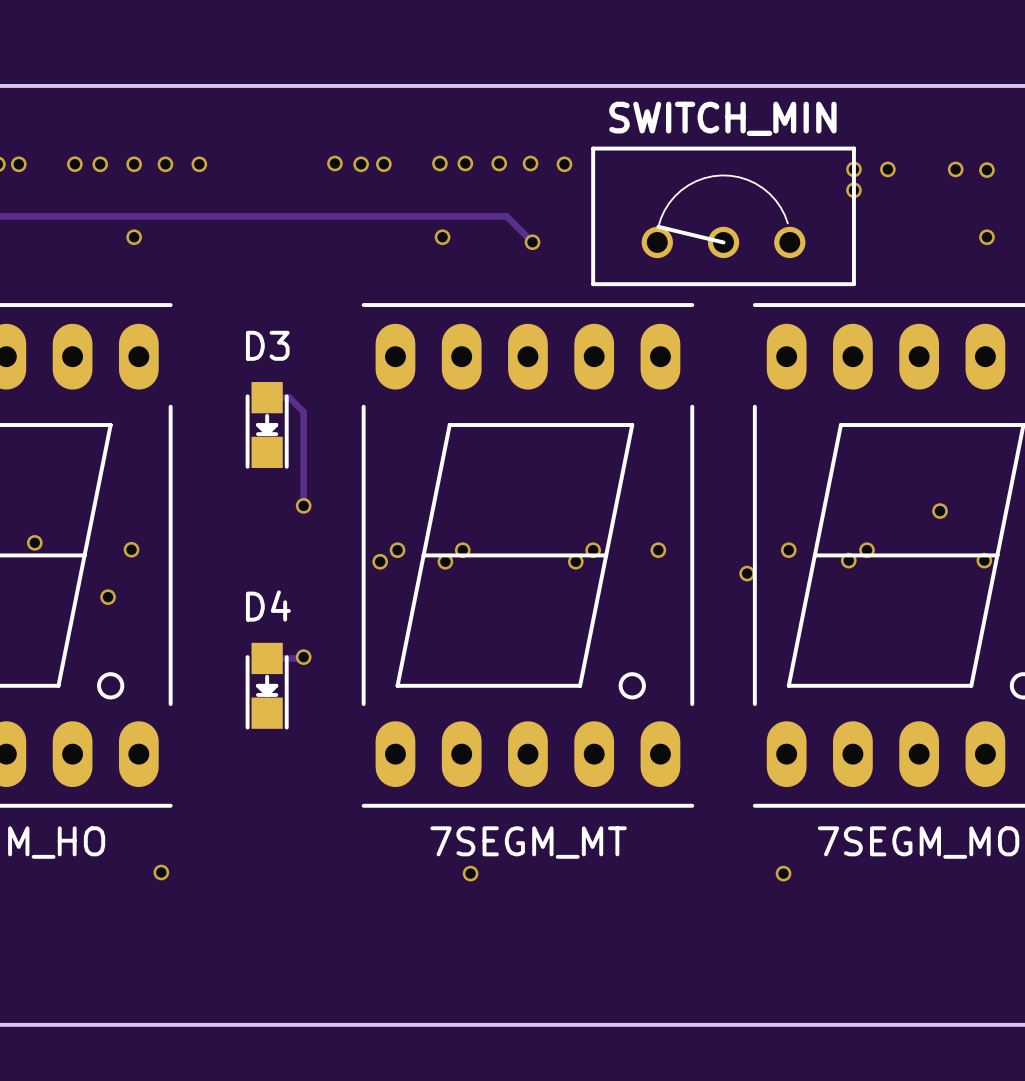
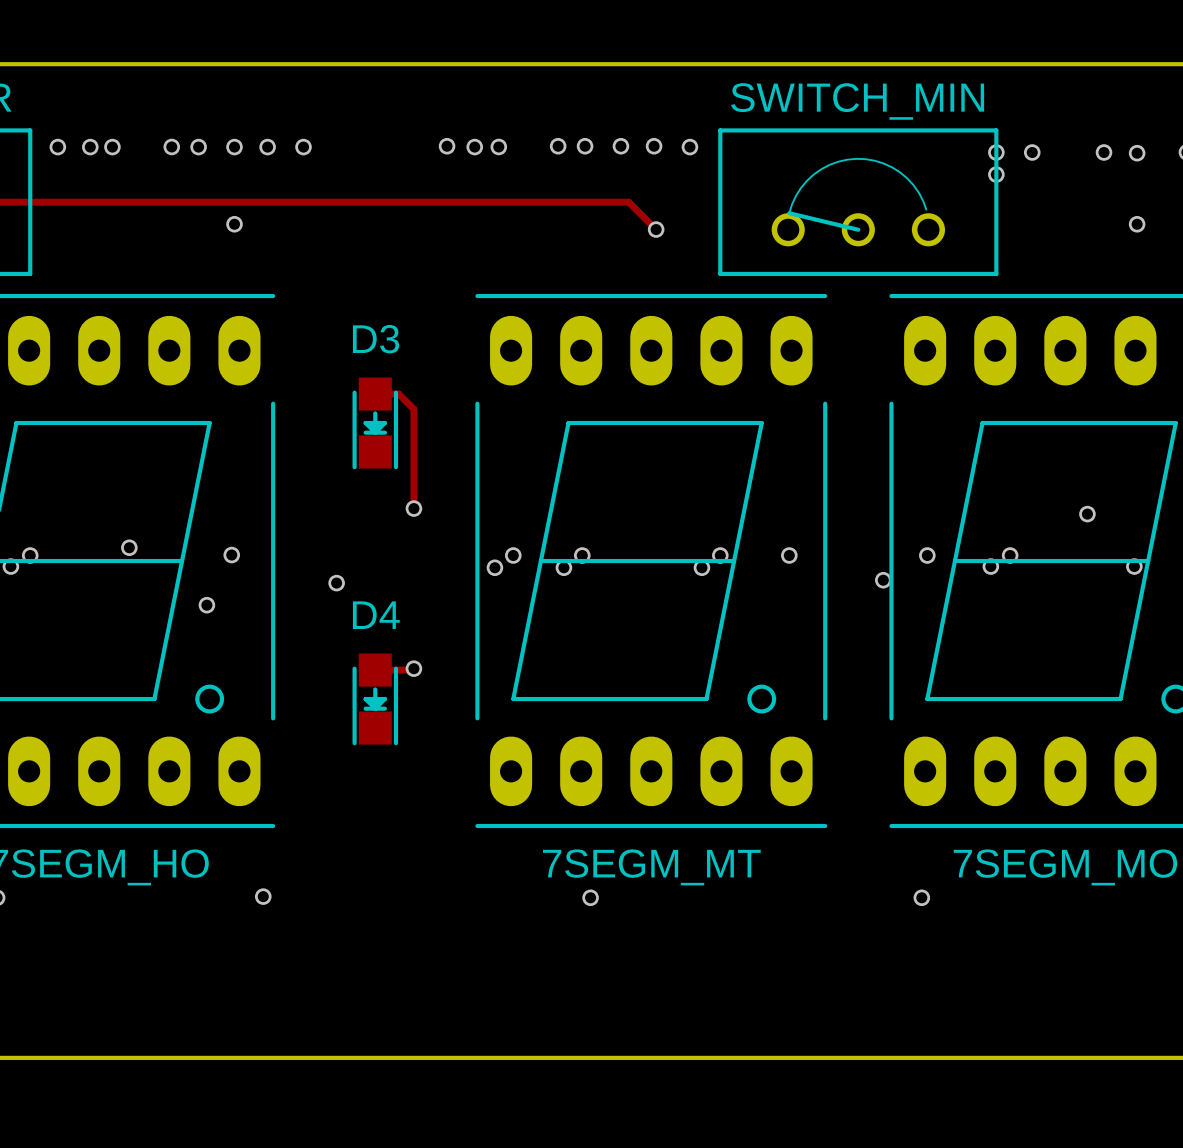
via: (442, 237) -> none
via: none -> (336, 583)

